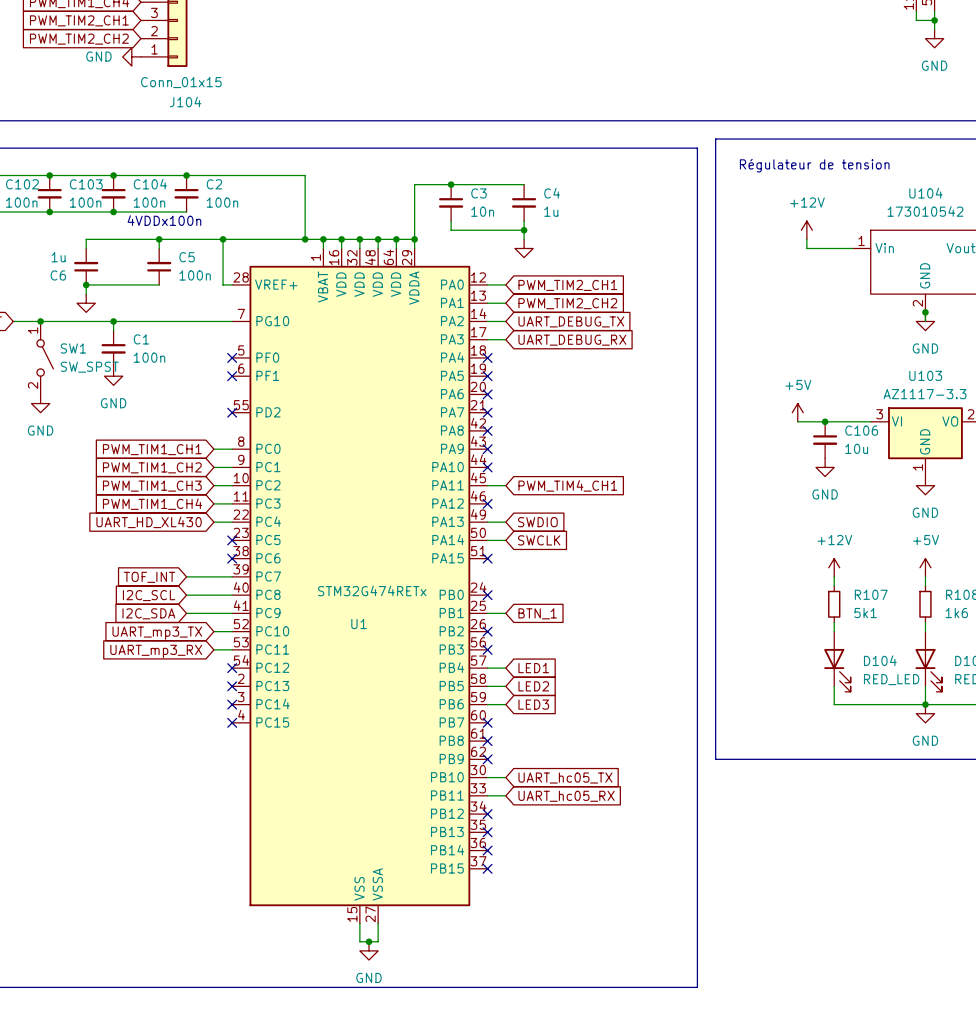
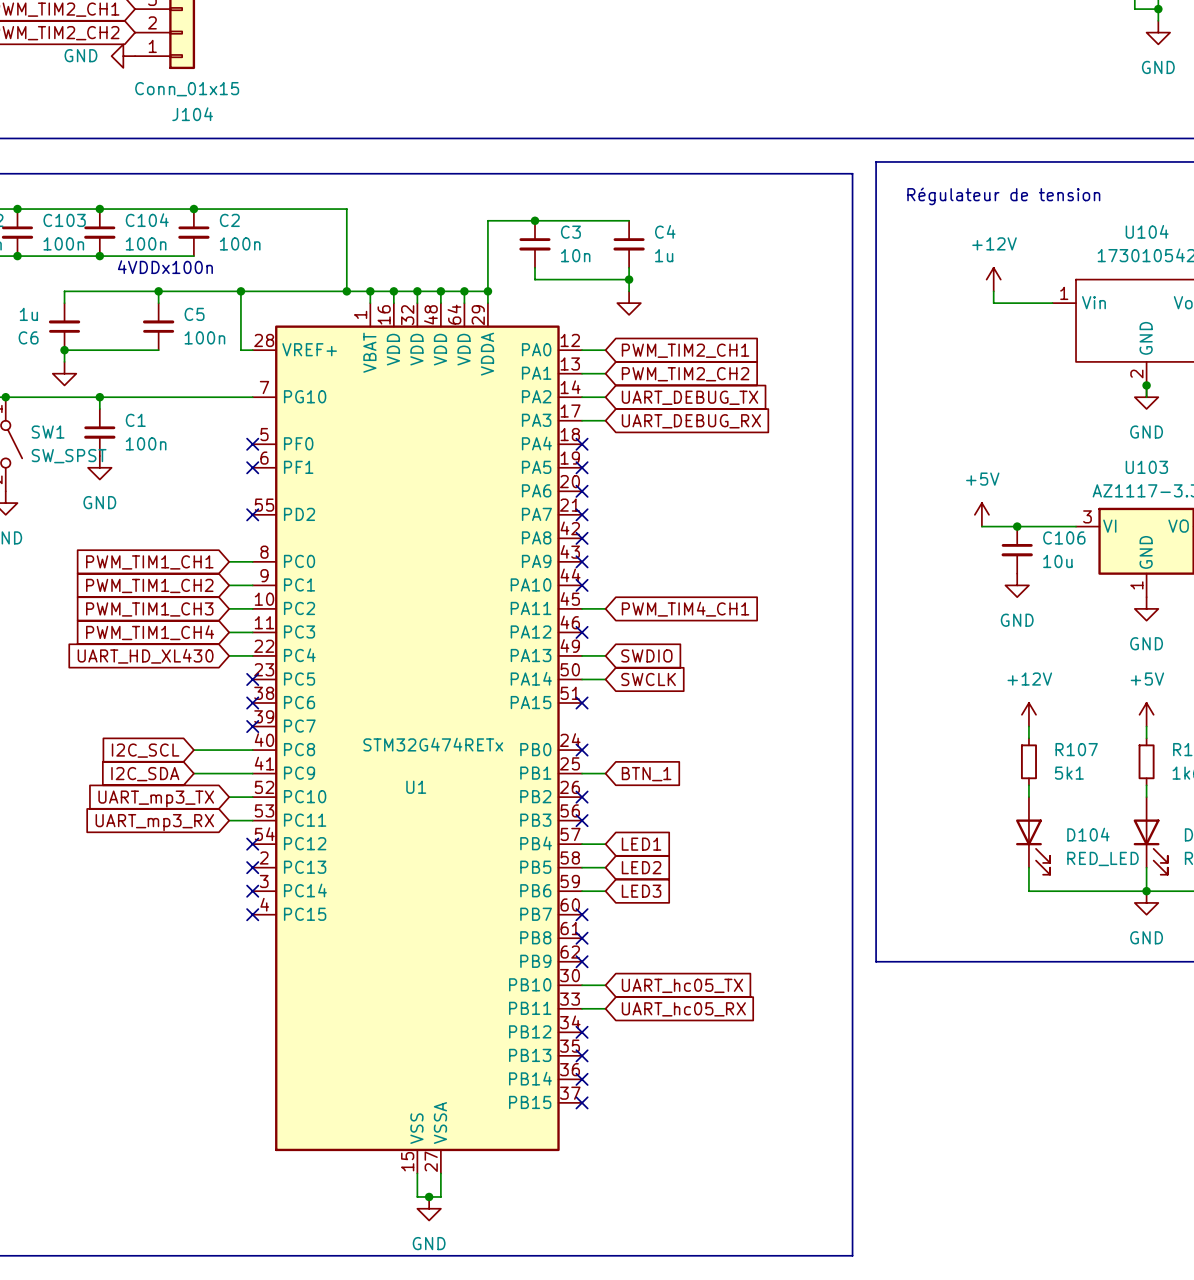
wire: (186, 576) (232, 576) -> none
no-connect mark: none -> (252, 726)
global label: TOF_INT (149, 577) -> none

